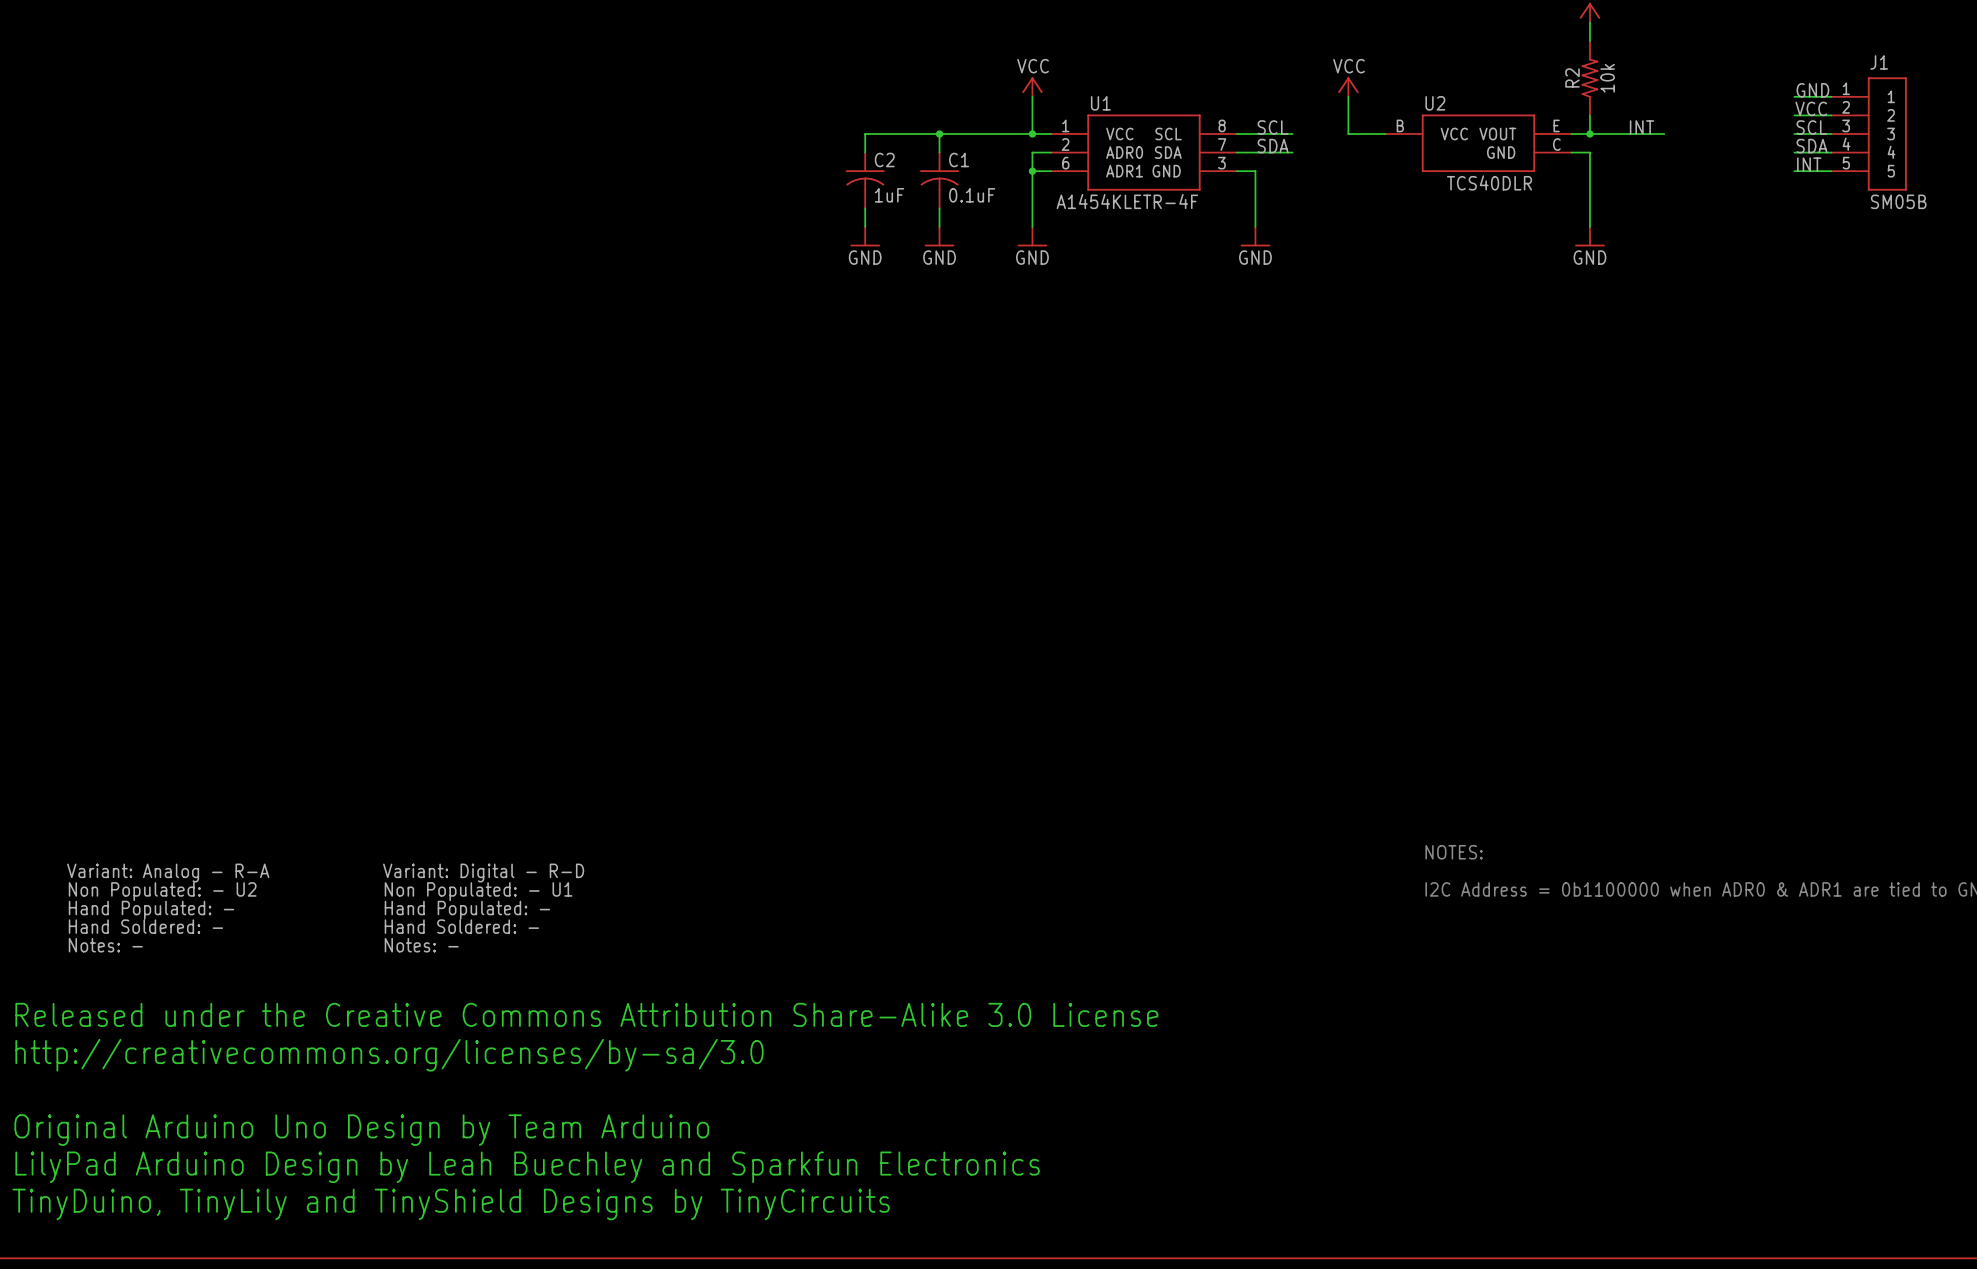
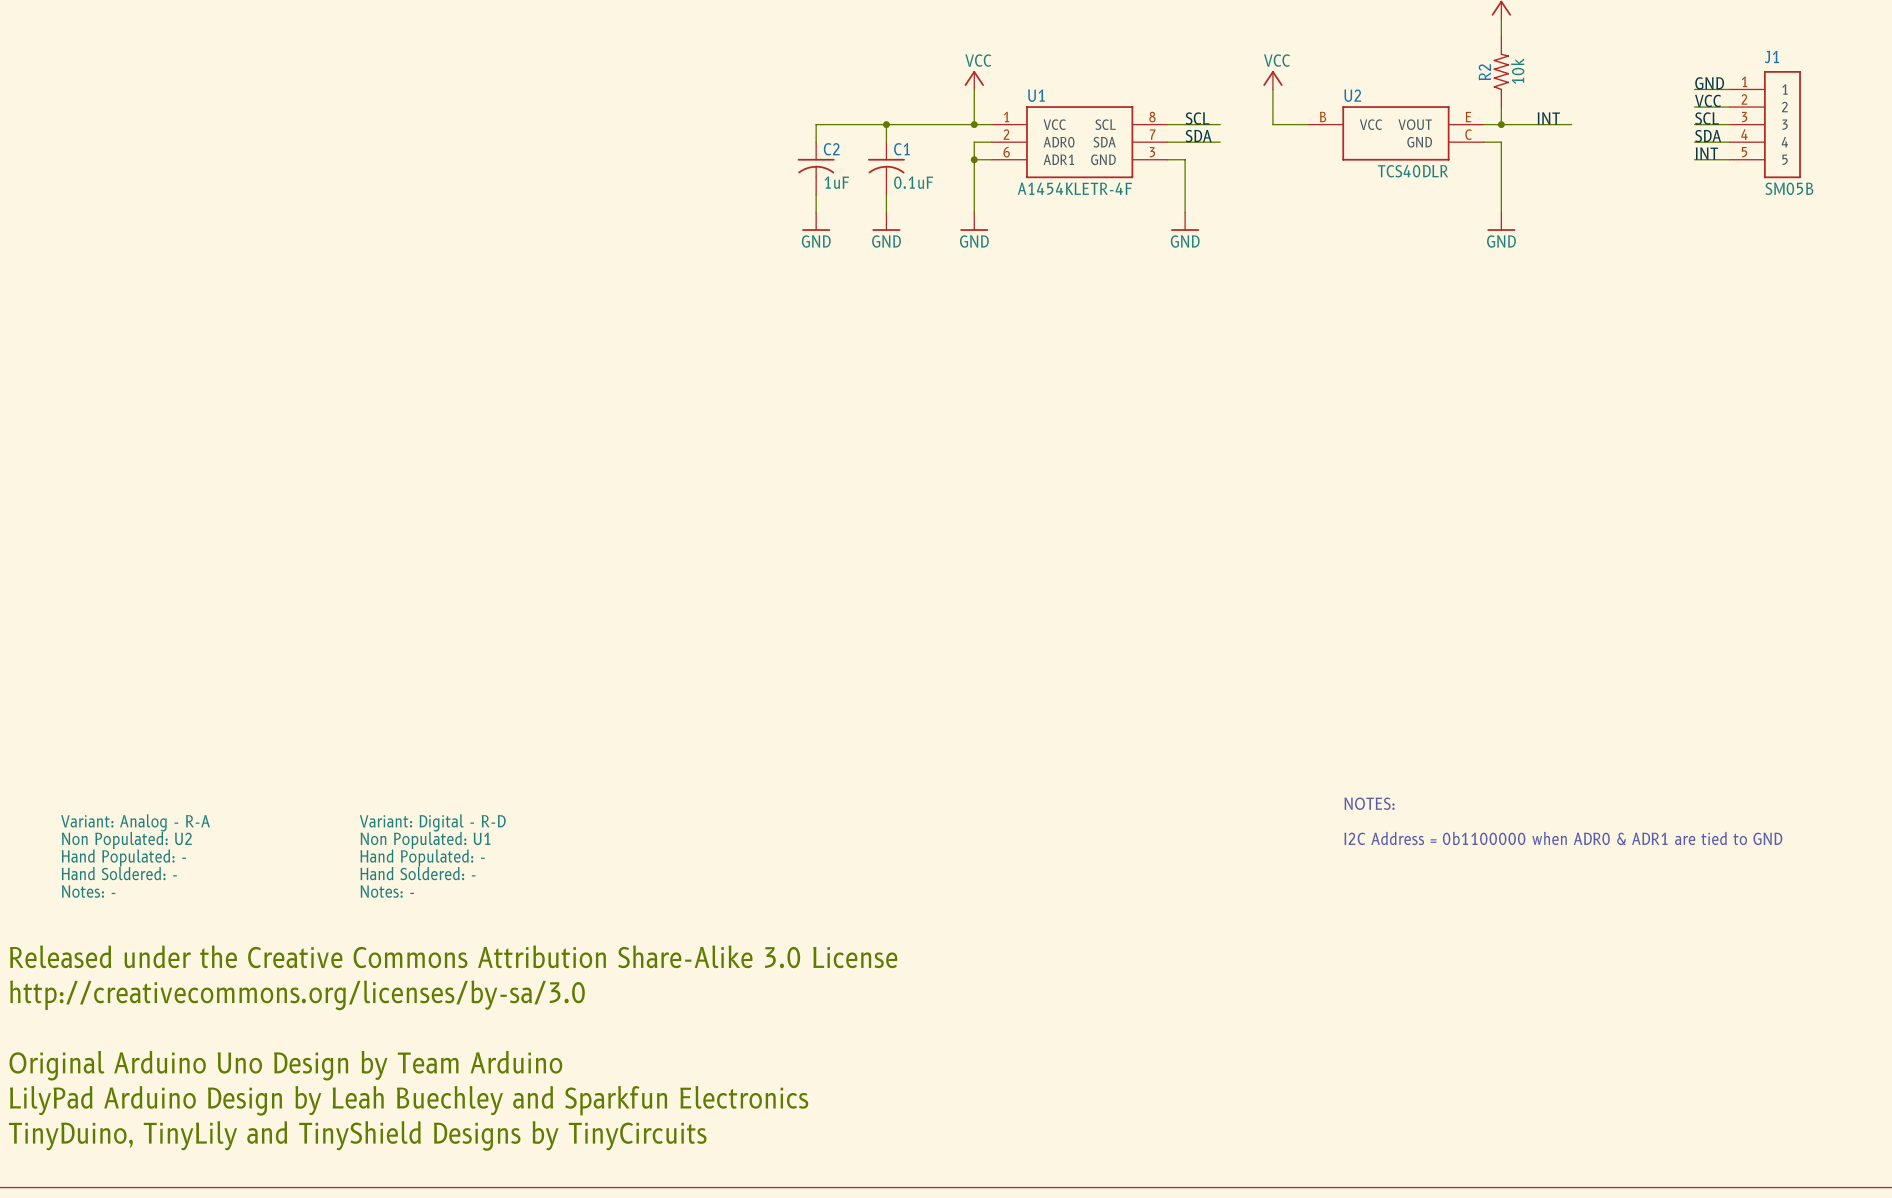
text: Non Populated: - U2 (162, 891) -> Non Populated: U2 (126, 840)
text: Non Populated: - U1 (478, 891) -> Non Populated: U1 (425, 840)

